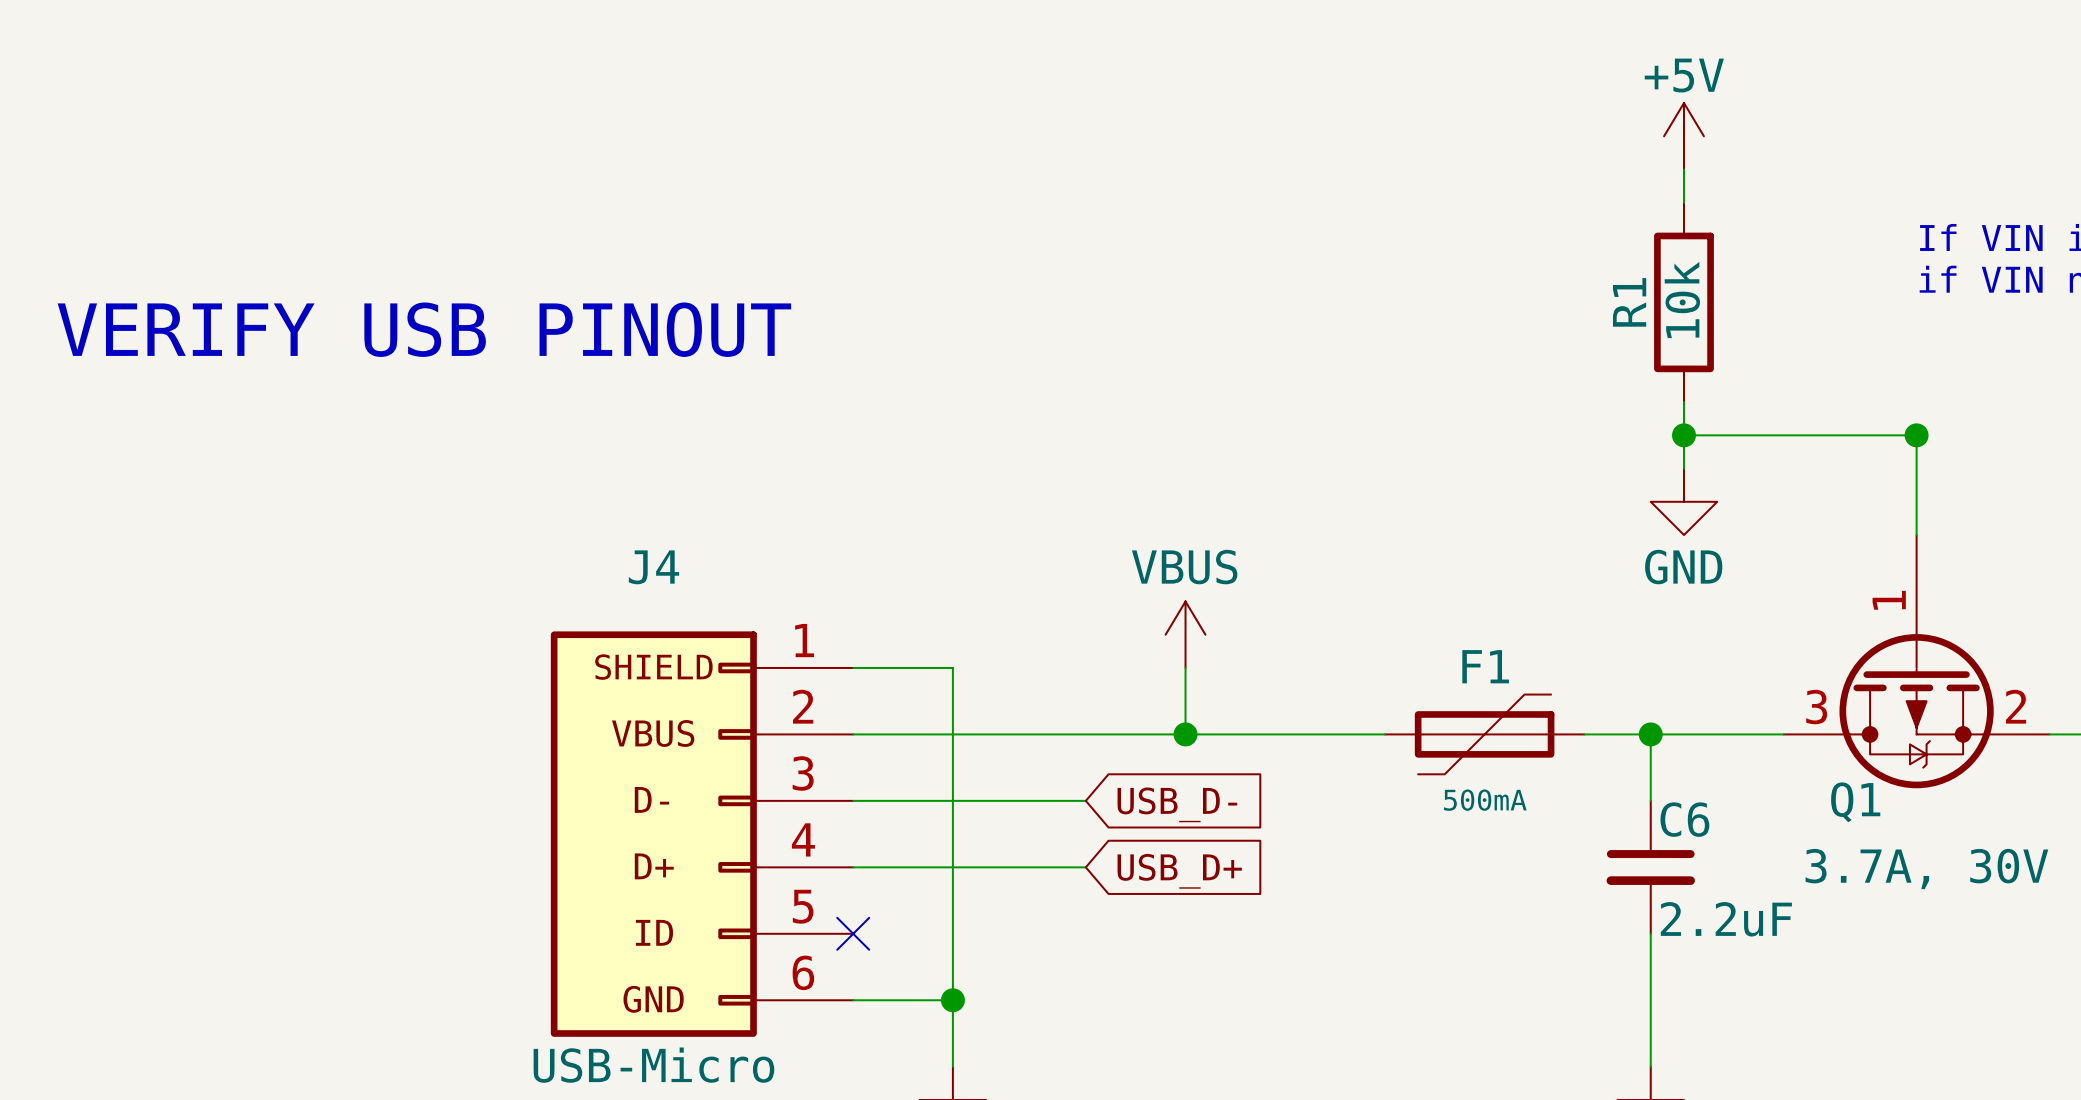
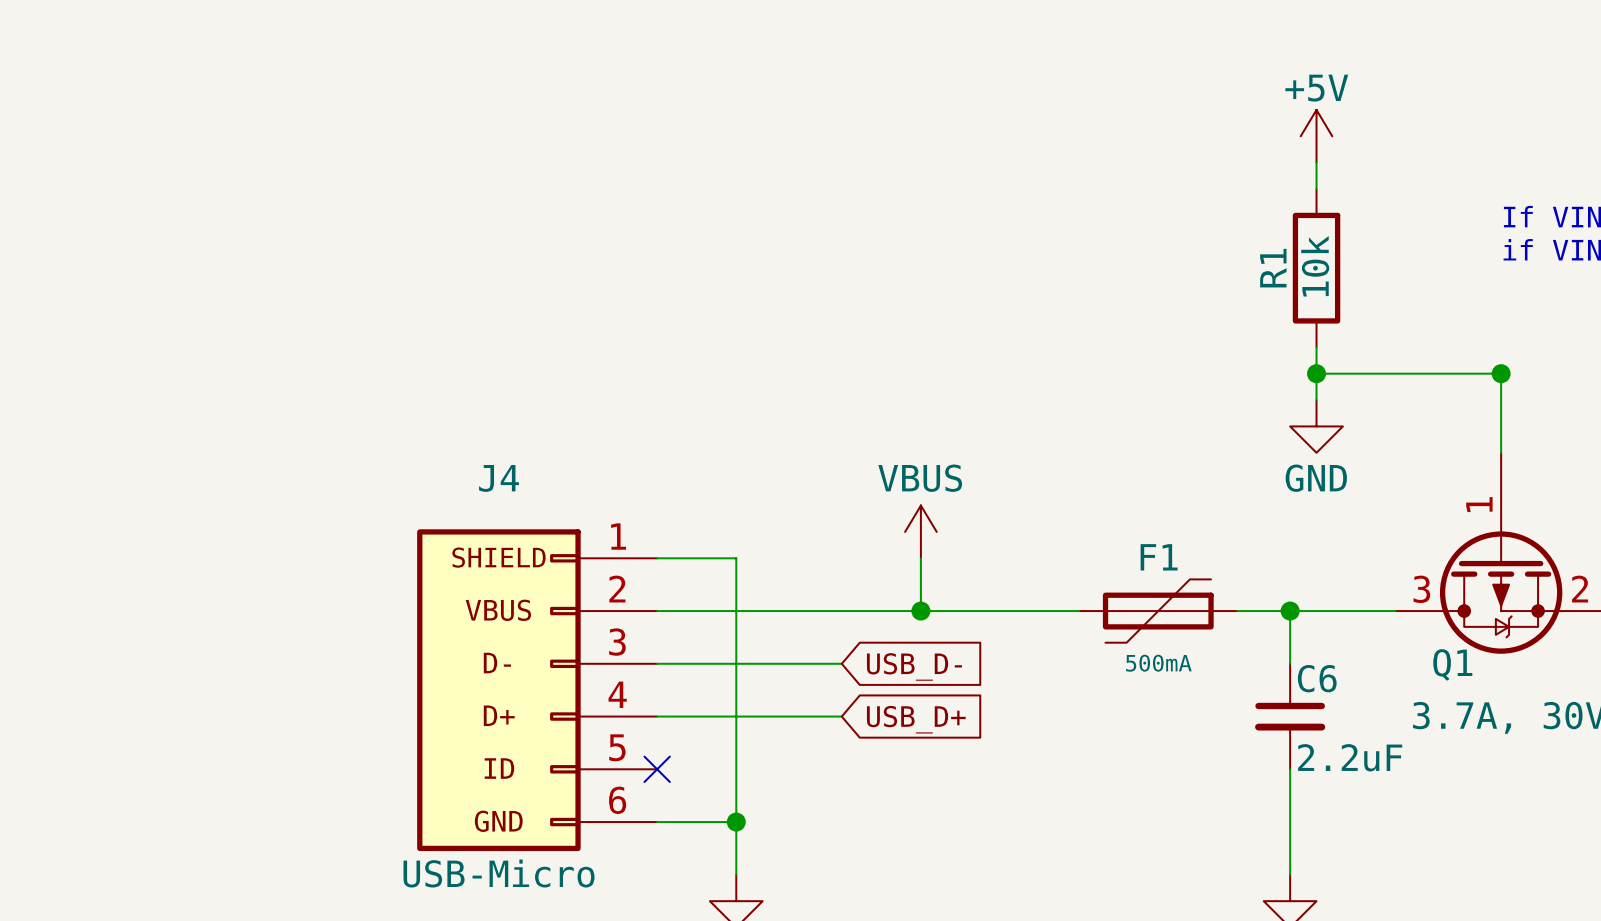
text: VERIFY USB PINOUT (424, 329) -> none

